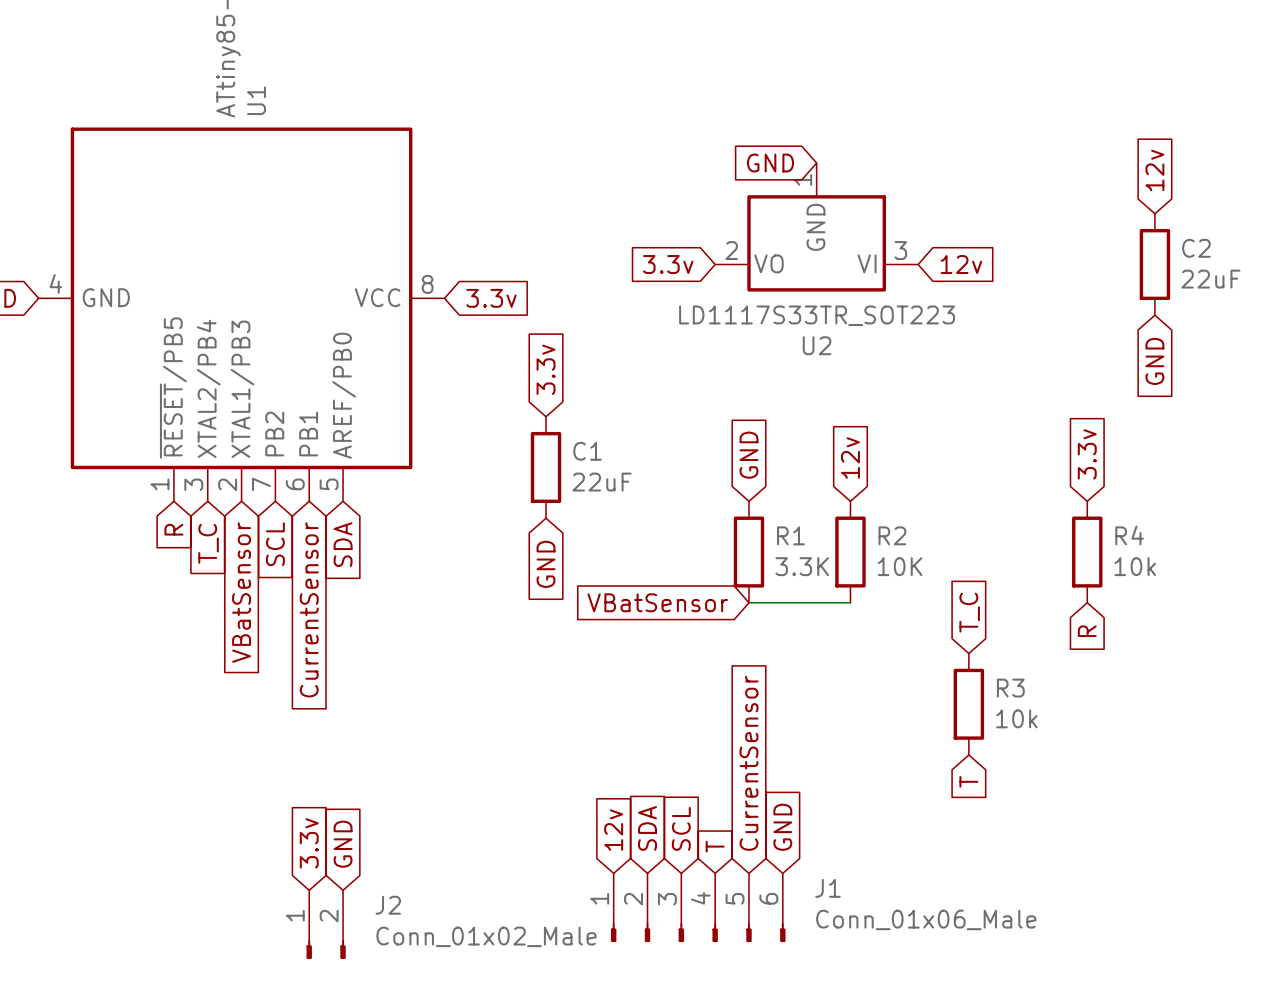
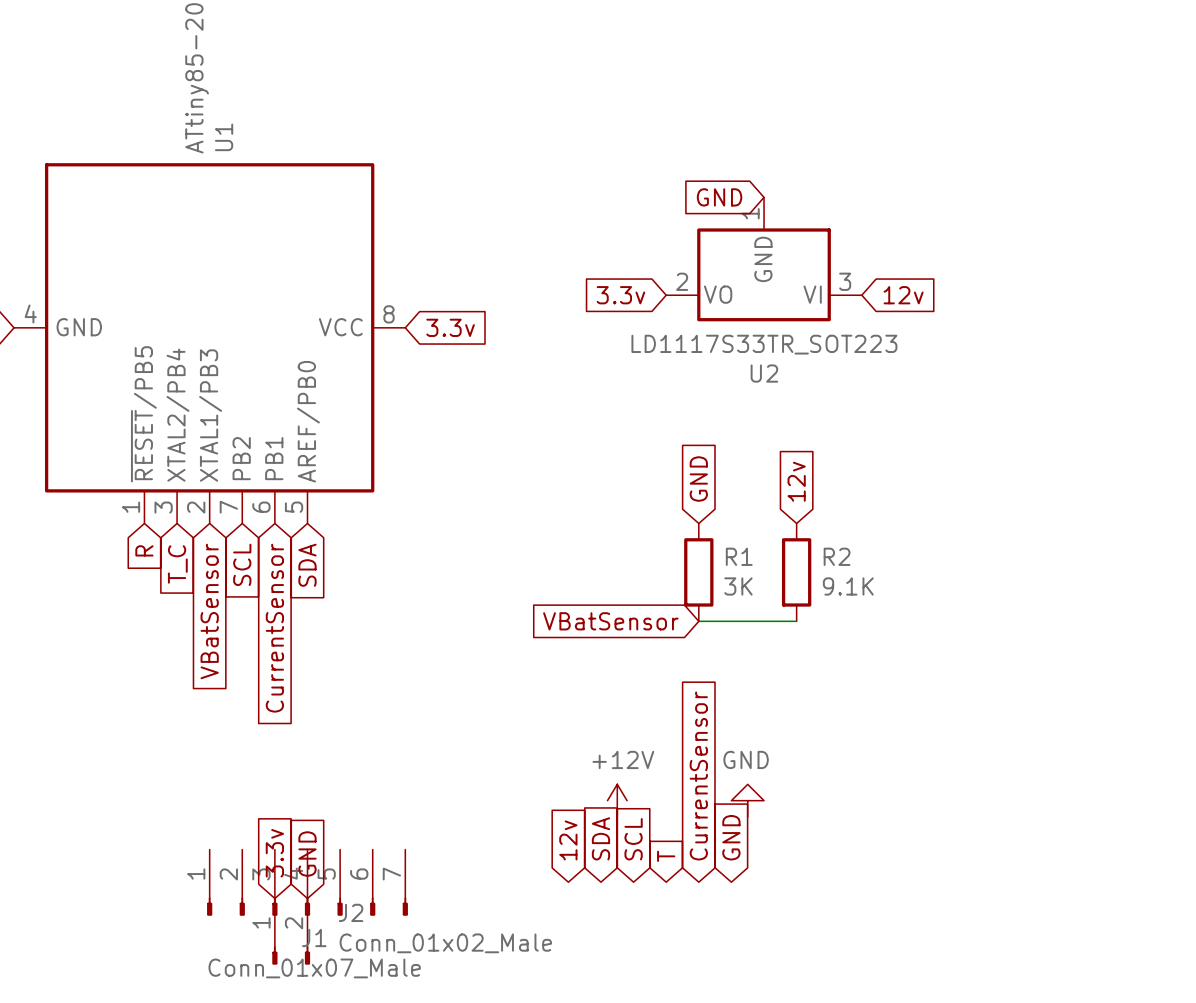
global label: 12v (1154, 170) -> none
C2: 22uF (1154, 264) -> none
global label: GND (1154, 361) -> none
global label: 3.3v (546, 369) -> none
global label: 3.3v (1087, 454) -> none
C1: 22uF (546, 467) -> none
R4: 10k (1087, 552) -> none
global label: GND (546, 564) -> none
R1 value: 3.3K (802, 566) -> 3K (738, 586)
R2 value: 10K (900, 566) -> 9.1K (848, 586)
global label: T_C (969, 612) -> none
global label: R (1087, 631) -> none
R3: 10k (968, 704) -> none
global label: T (968, 781) -> none
power symbol: none -> +12V (617, 800)
power symbol: none -> GND (747, 800)
J1 symbol: [610, 873, 786, 943] -> [207, 849, 408, 916]
J1 name position: J1 (828, 888) -> J1 (314, 938)
J1 value: Conn_01x06_Male (926, 919) -> Conn_01x07_Male (314, 968)

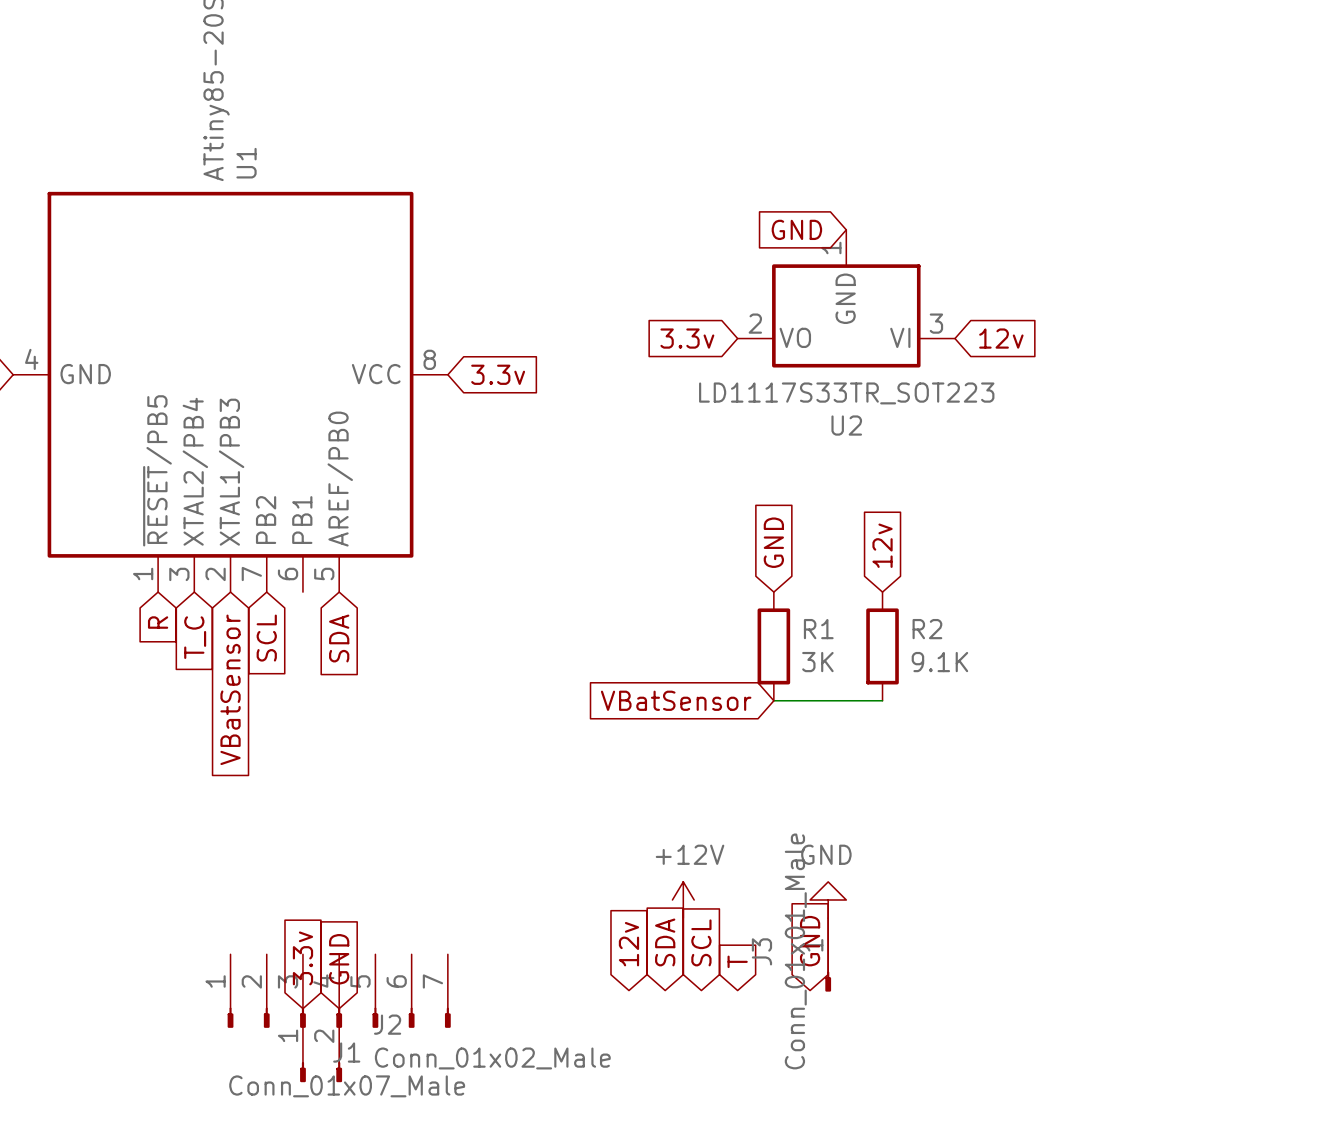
global label: CurrentSensor (274, 628) -> none
global label: CurrentSensor (698, 775) -> none
J3: none -> Conn_01x01_Male (828, 954)

